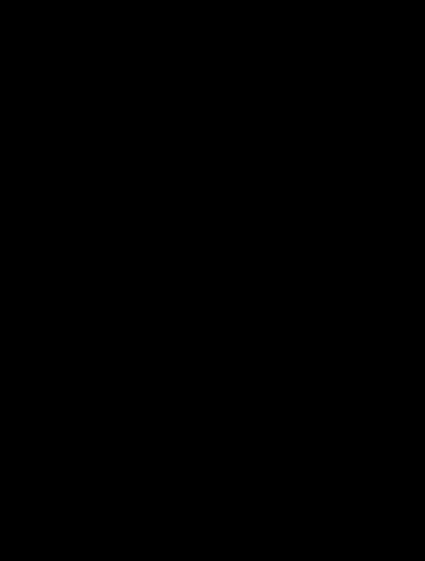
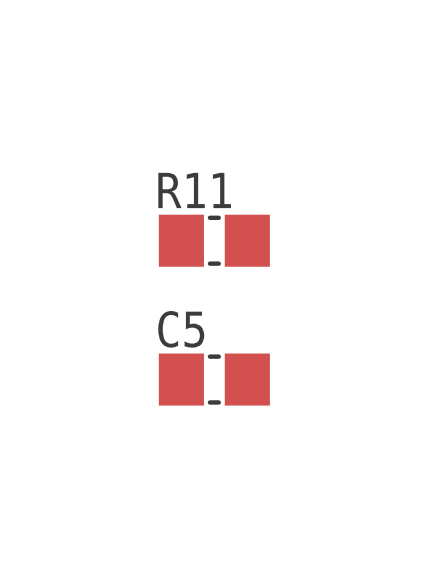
R11: none -> (214, 240)
C5: none -> (214, 379)

